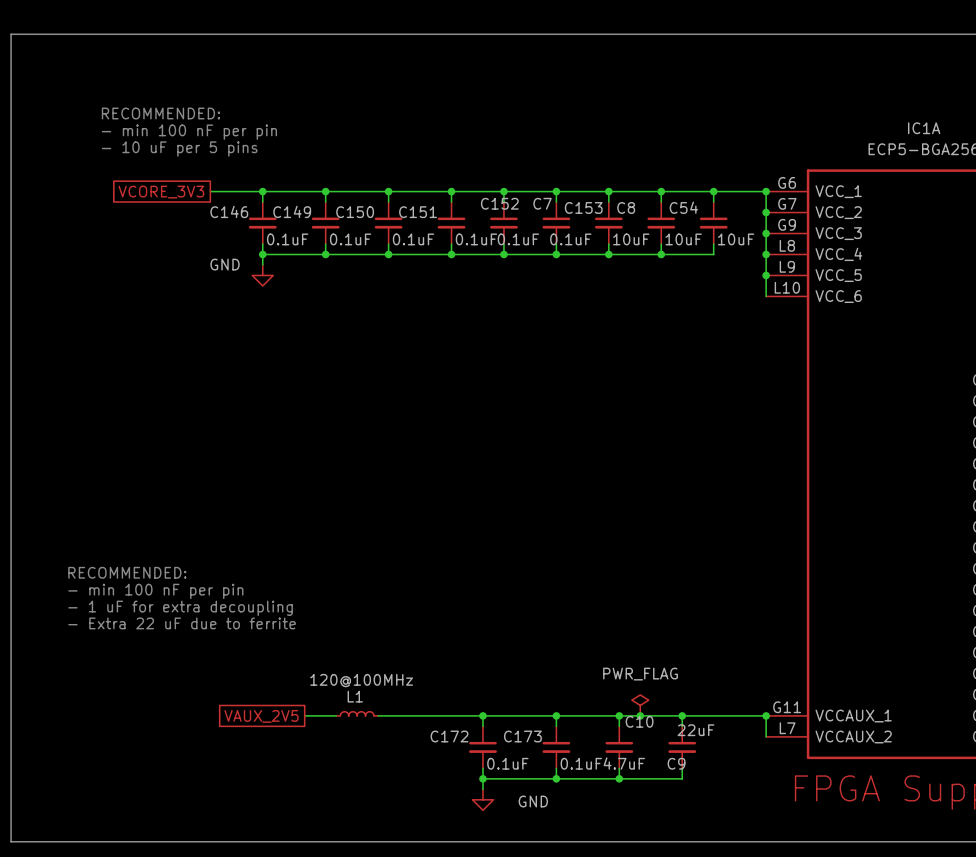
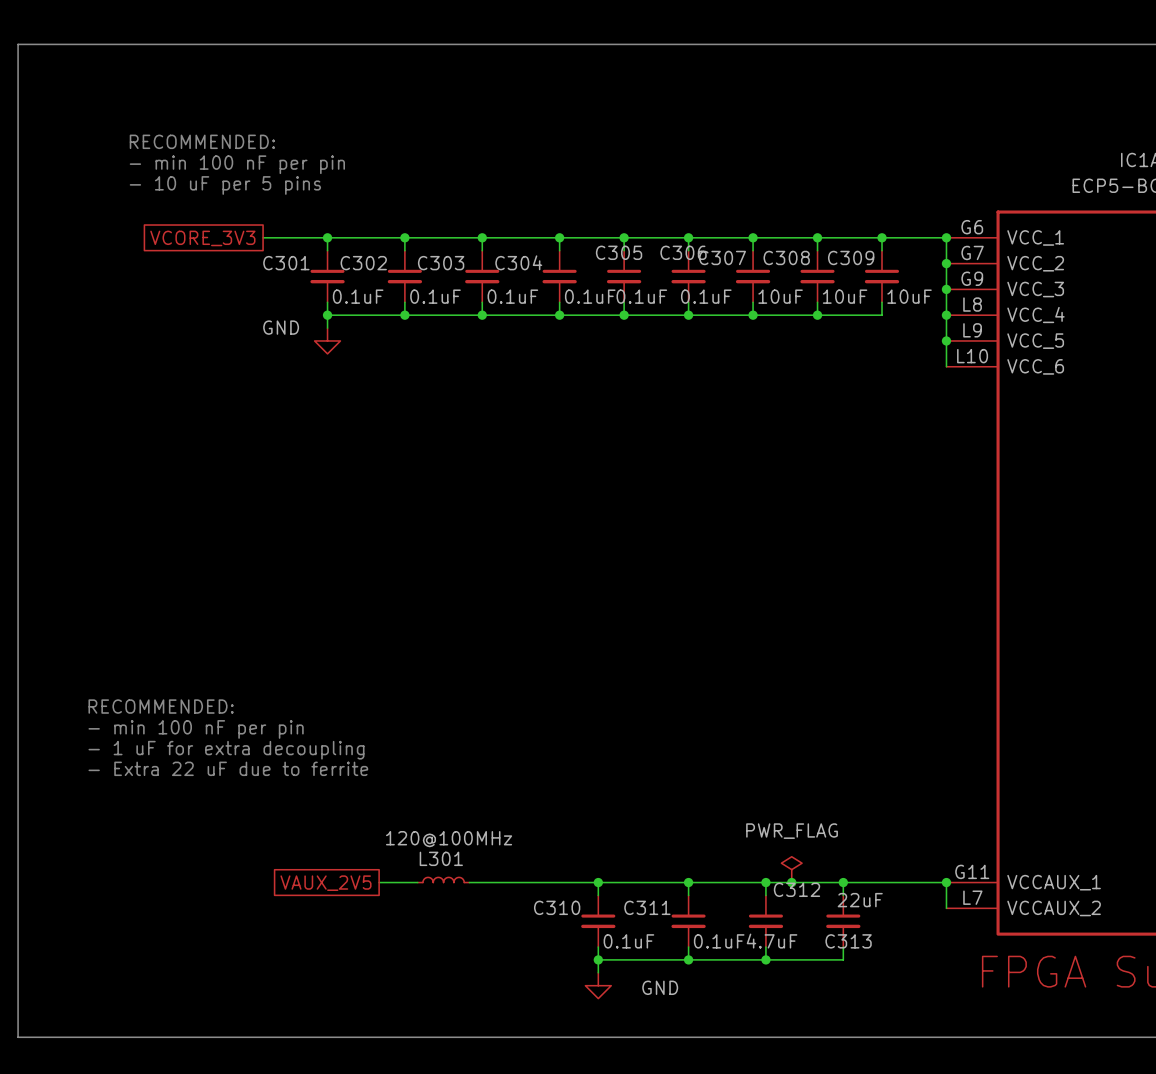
C152 name: C152 (499, 203) -> C305 (619, 252)
C7 name: C7 (542, 203) -> C306 (683, 252)
C153 name: C153 (583, 207) -> C307 (722, 257)
C8 name: C8 (626, 207) -> C308 (786, 257)
C54 name: C54 (683, 207) -> C309 (851, 257)
C146 name: C146 (229, 211) -> C301 (286, 263)
C149 name: C149 (292, 211) -> C302 (363, 263)
C150 name: C150 (355, 212) -> C303 (441, 263)
C151 name: C151 (418, 212) -> C304 (518, 262)
L1 name: L1 (355, 696) -> L301 (441, 858)
C10 name: C10 (639, 721) -> C312 (796, 889)
C172 name: C172 (449, 736) -> C310 (557, 907)
C173 name: C173 (522, 736) -> C311 (647, 907)
C9 name: C9 (676, 763) -> C313 (848, 941)

